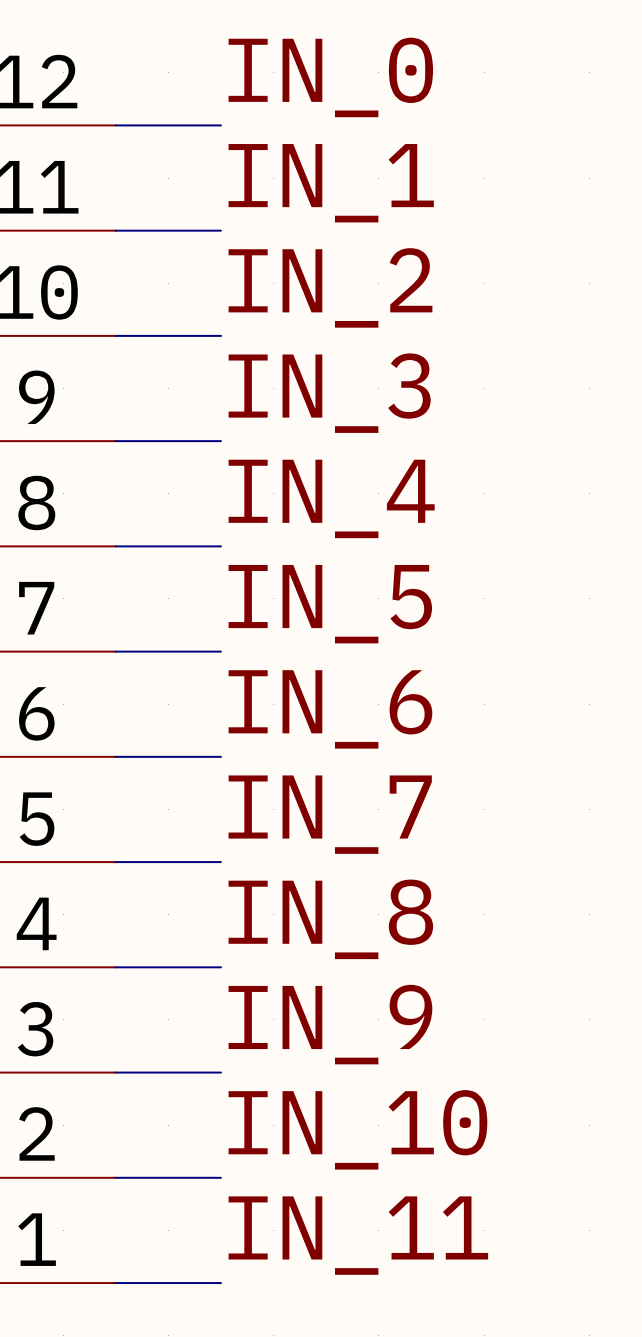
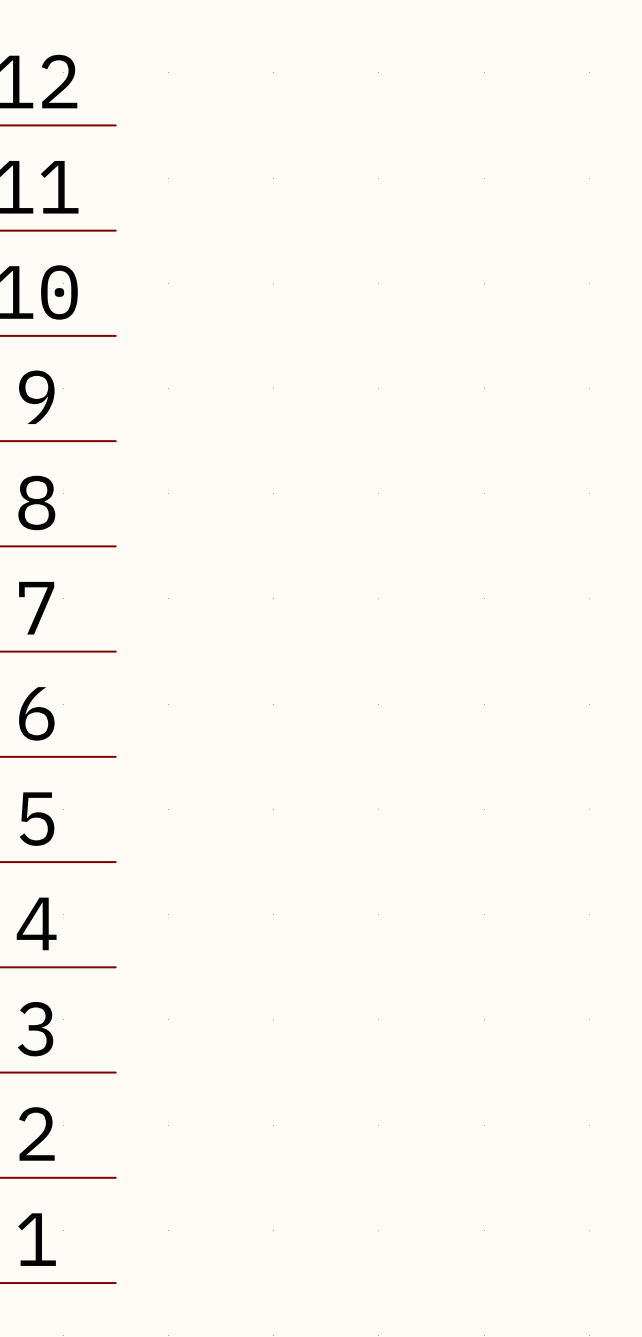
label: IN_0 (330, 77) -> none
wire: (115, 125) (220, 125) -> none
label: IN_1 (331, 183) -> none
wire: (115, 230) (220, 230) -> none
label: IN_2 (330, 287) -> none
wire: (115, 335) (220, 335) -> none
label: IN_3 (329, 393) -> none
wire: (115, 441) (220, 441) -> none
label: IN_4 (331, 498) -> none
wire: (115, 546) (220, 546) -> none
label: IN_5 (330, 604) -> none
wire: (115, 651) (220, 651) -> none
label: IN_6 (330, 709) -> none
wire: (115, 756) (220, 756) -> none
label: IN_7 (330, 814) -> none
wire: (115, 862) (220, 862) -> none
label: IN_8 (330, 919) -> none
wire: (115, 967) (220, 967) -> none
label: IN_9 (330, 1024) -> none
wire: (115, 1072) (220, 1072) -> none
label: IN_10 (357, 1129) -> none
wire: (115, 1177) (220, 1177) -> none
label: IN_11 (358, 1235) -> none
wire: (115, 1283) (220, 1283) -> none

